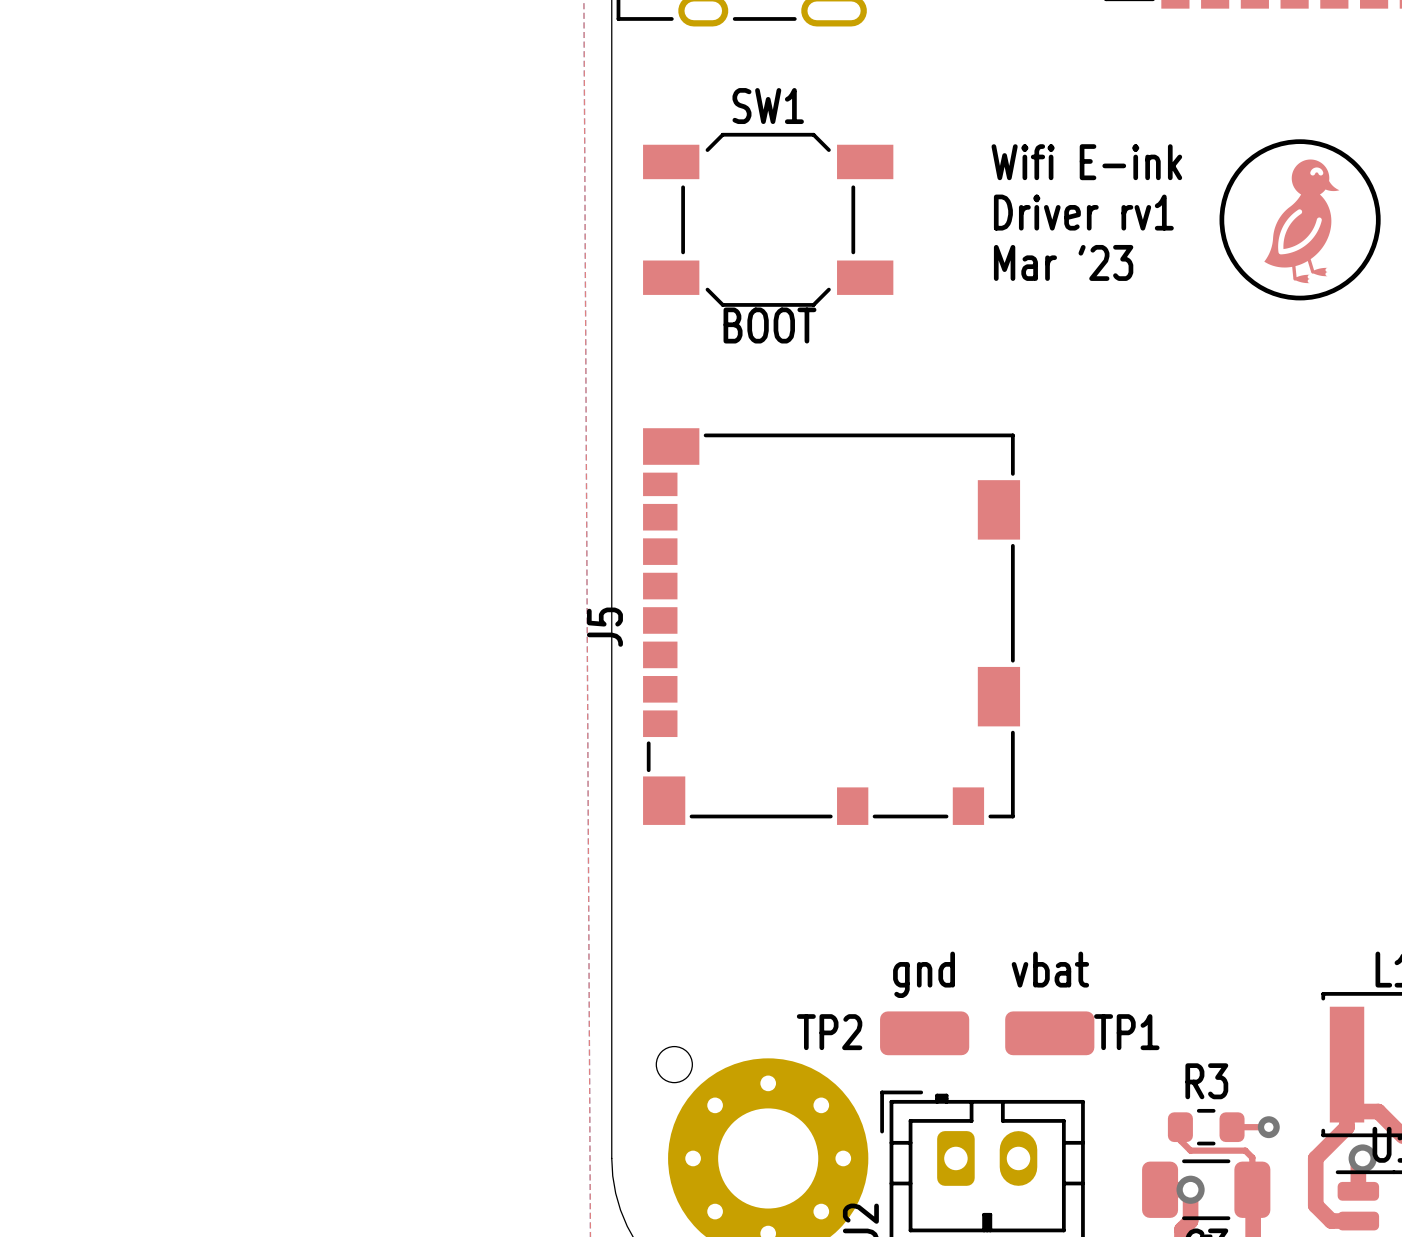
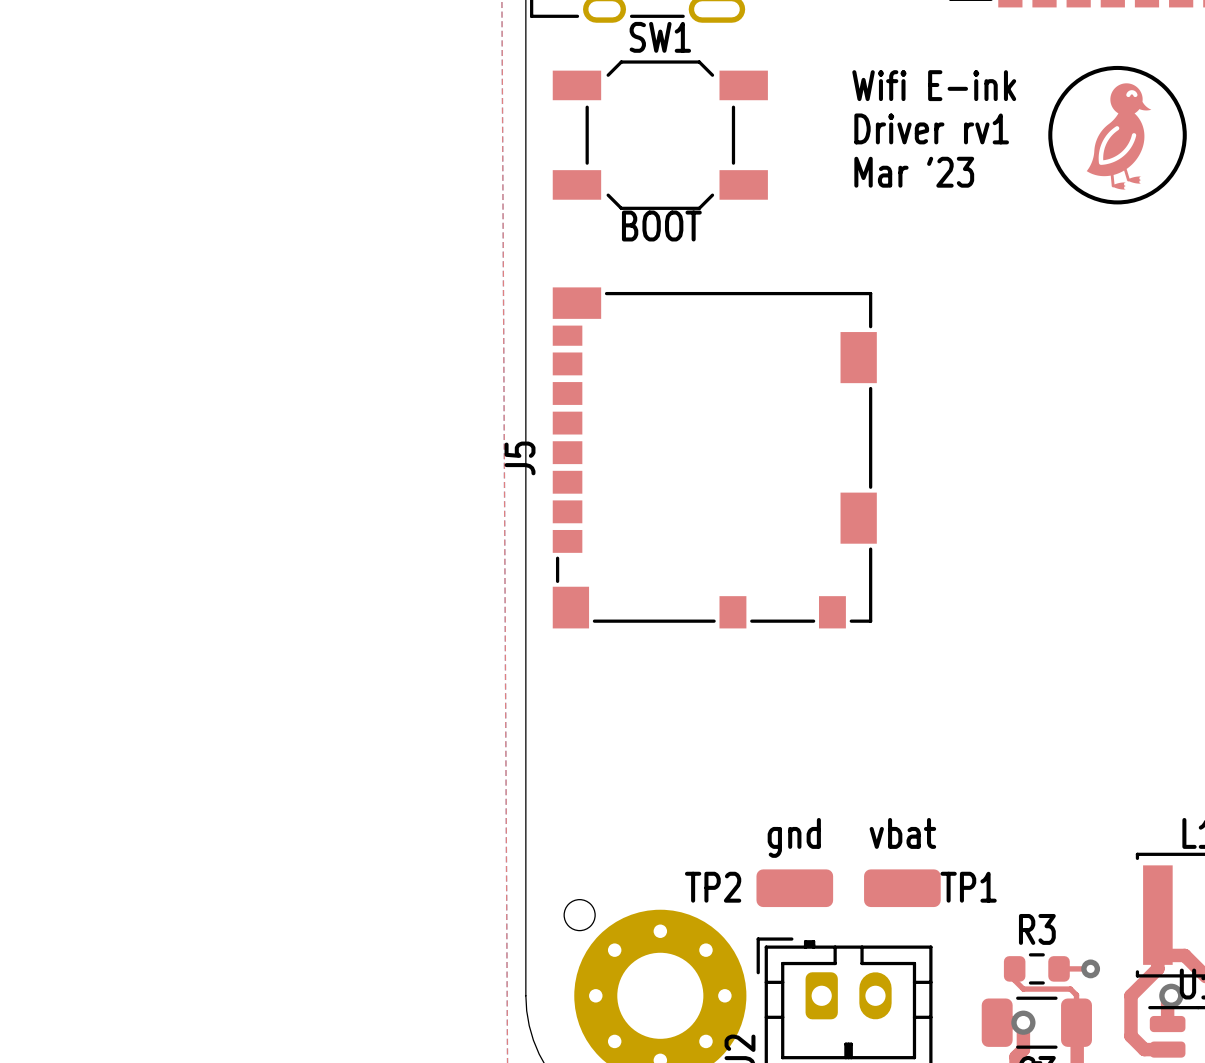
text: none -> Wifi E-ink (934, 85)
text: Wifi E-ink (1086, 162) -> Driver rv1 (931, 128)
text: Driver rv1 (1083, 212) -> Mar '23 (914, 172)
SW1 position: (768, 219) -> (660, 135)
part position: (1300, 219) -> (1117, 135)
text: Mar '23 (1063, 262) -> none
text position: BOOT (769, 325) -> BOOT (661, 226)
J5 position: (831, 626) -> (714, 457)

